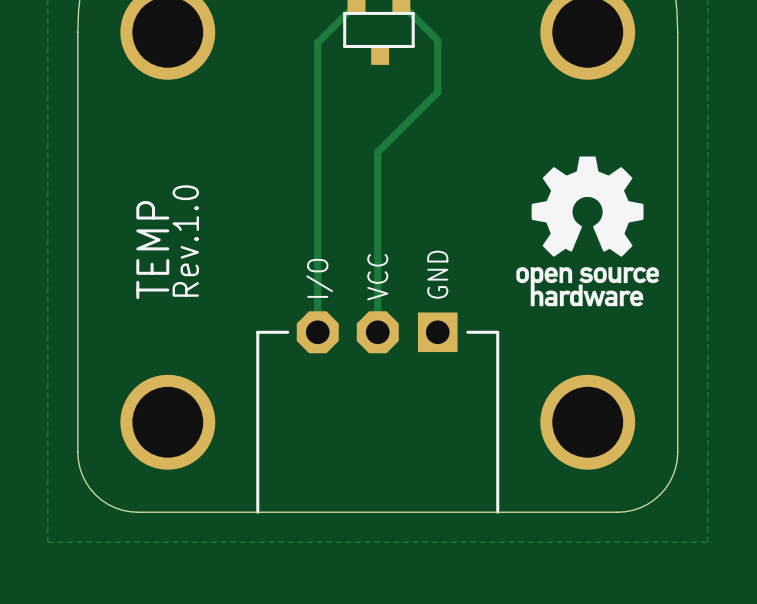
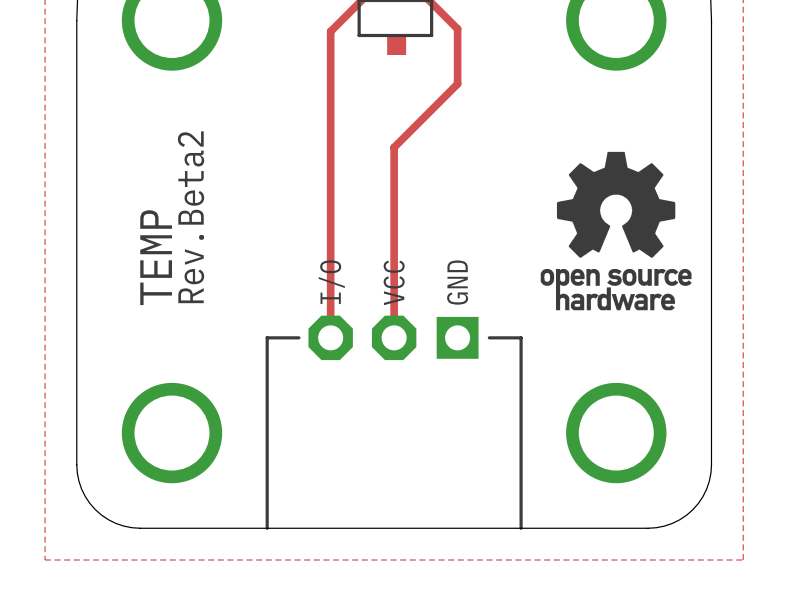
text: Rev.1.0 (185, 241) -> Rev.Beta2 (191, 217)

